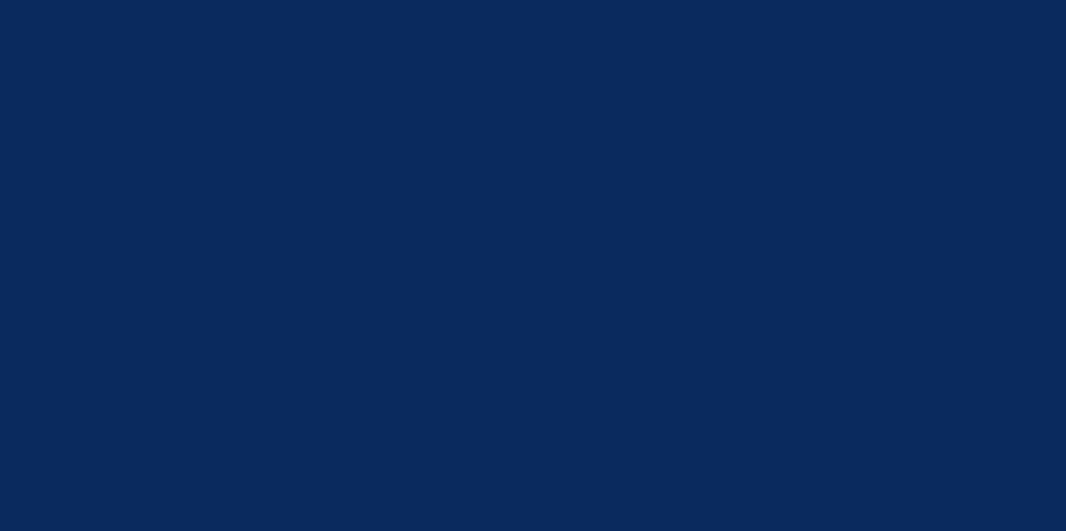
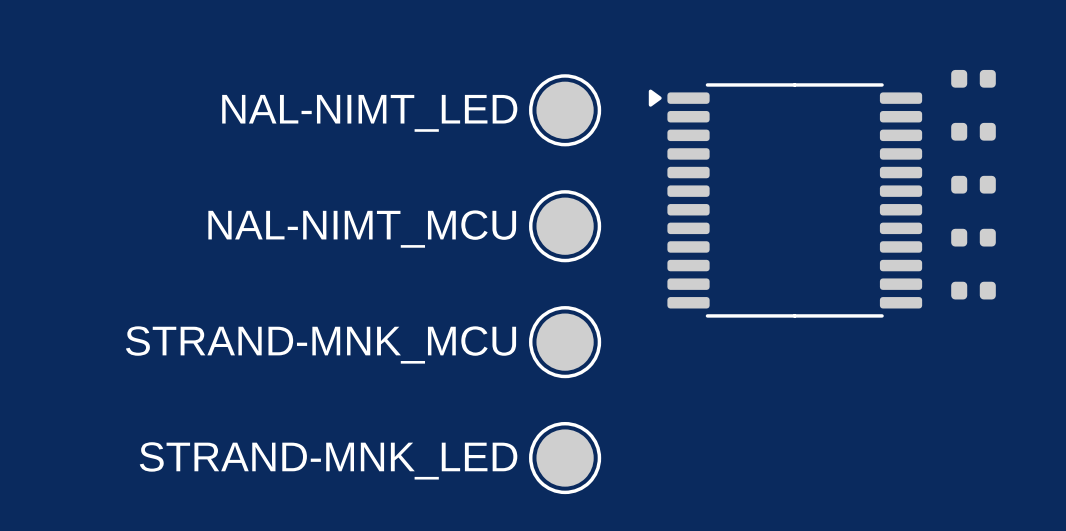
part: none -> (973, 78)
part: none -> NAL-NIMT_LED (565, 110)
part: none -> (973, 131)
part: none -> (973, 184)
part: none -> (785, 200)
part: none -> NAL-NIMT_MCU (565, 226)
part: none -> (973, 237)
part: none -> (973, 290)
part: none -> STRAND-MNK_MCU (565, 342)
part: none -> STRAND-MNK_LED (565, 458)

